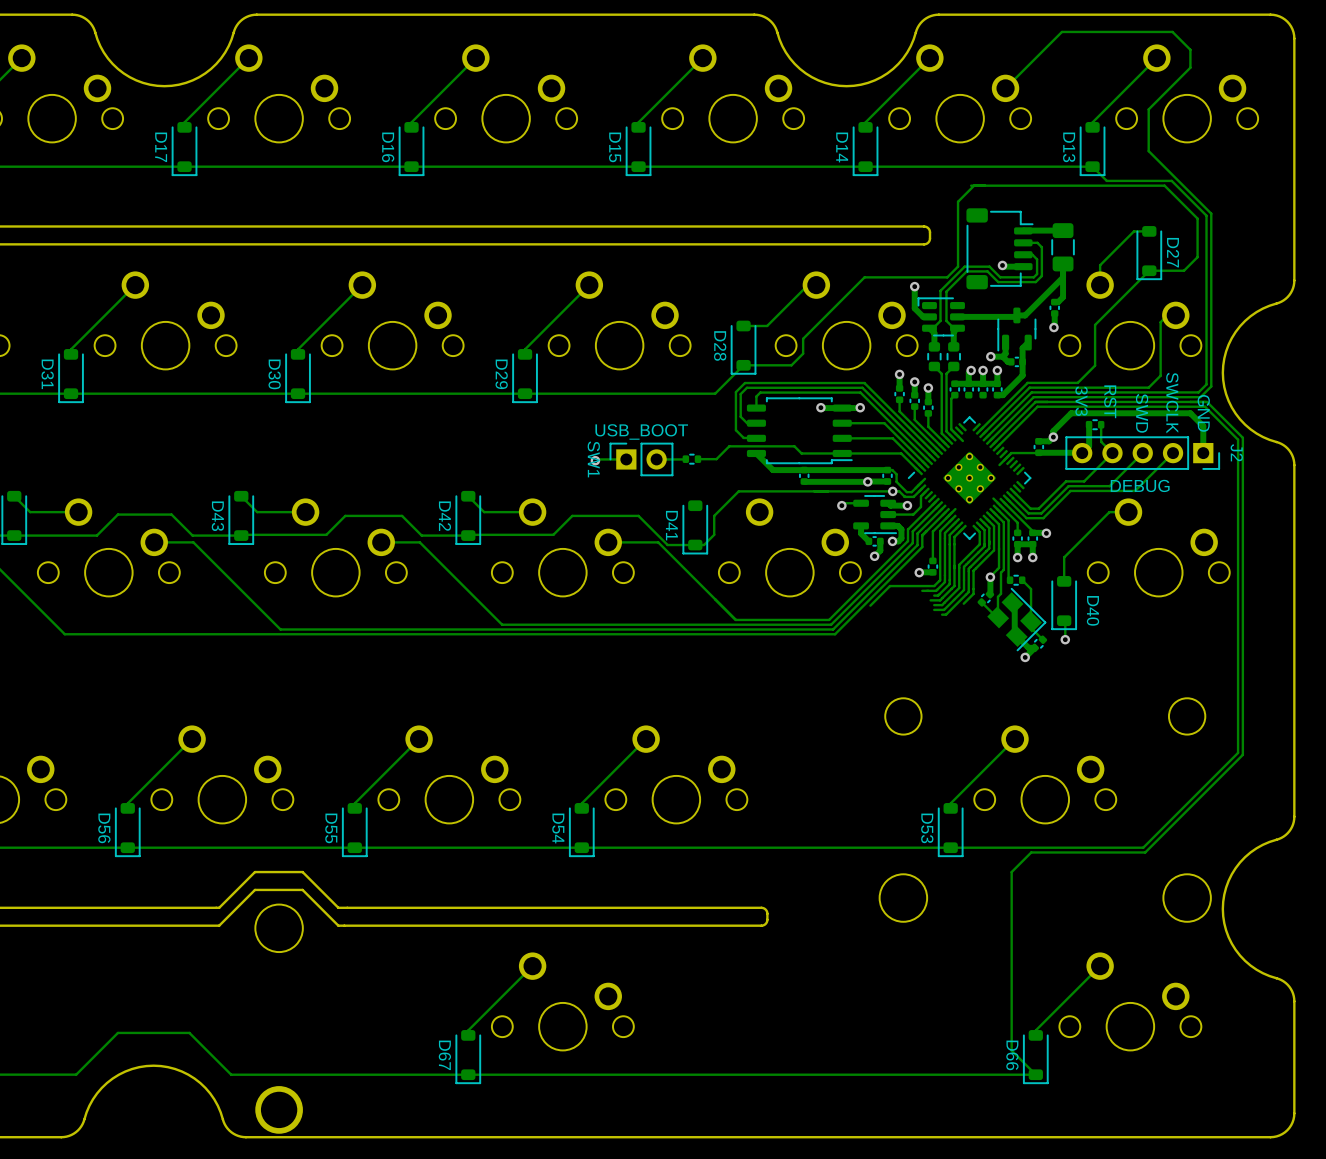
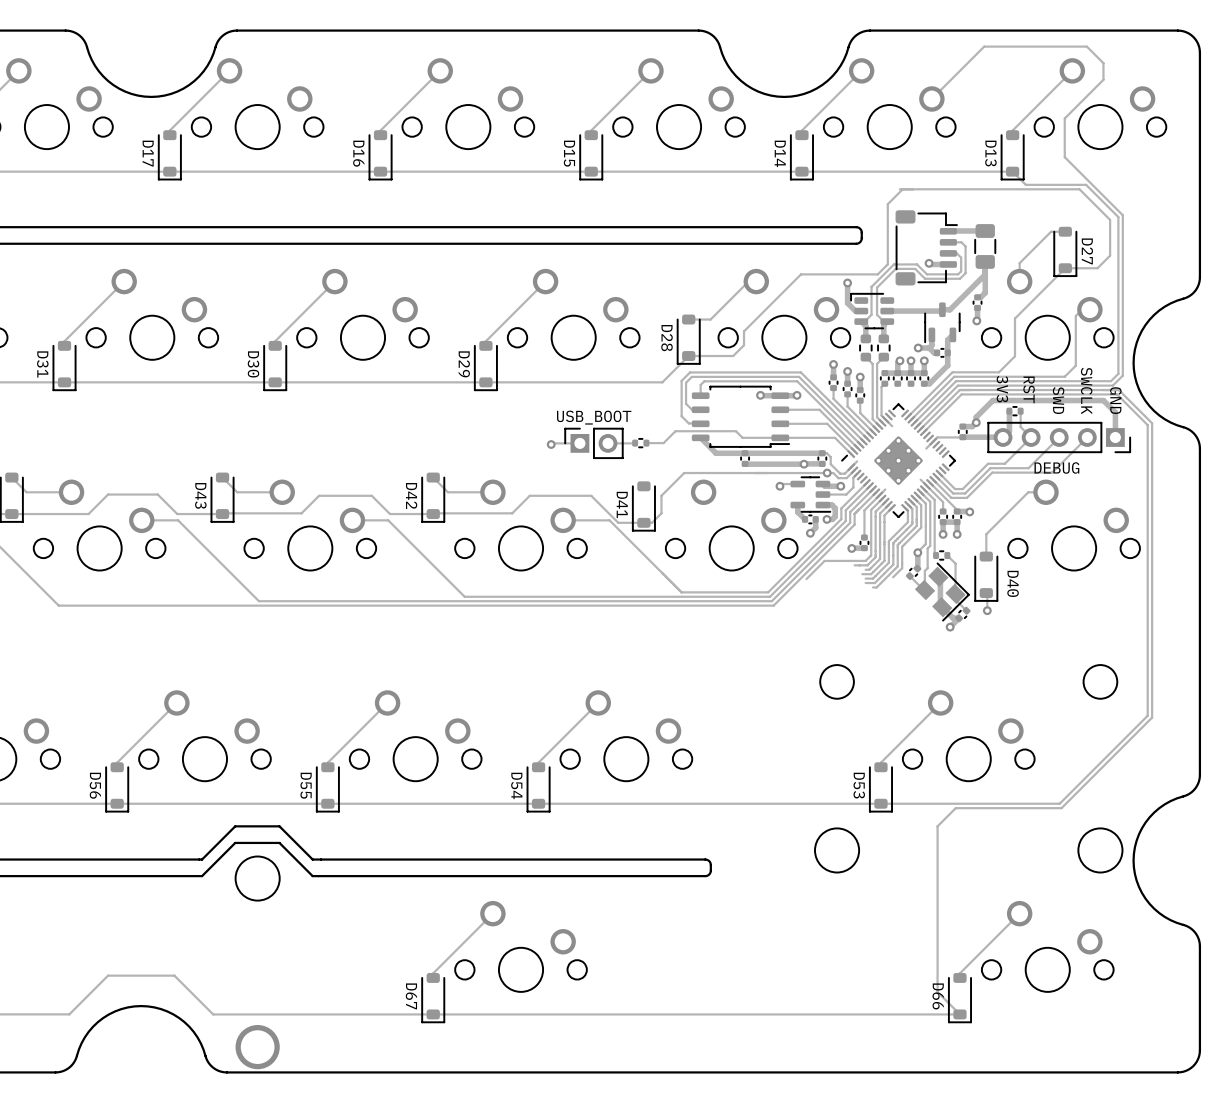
J2 name: J2 (1236, 452) -> none
SW1 name: SW1 (593, 459) -> none

